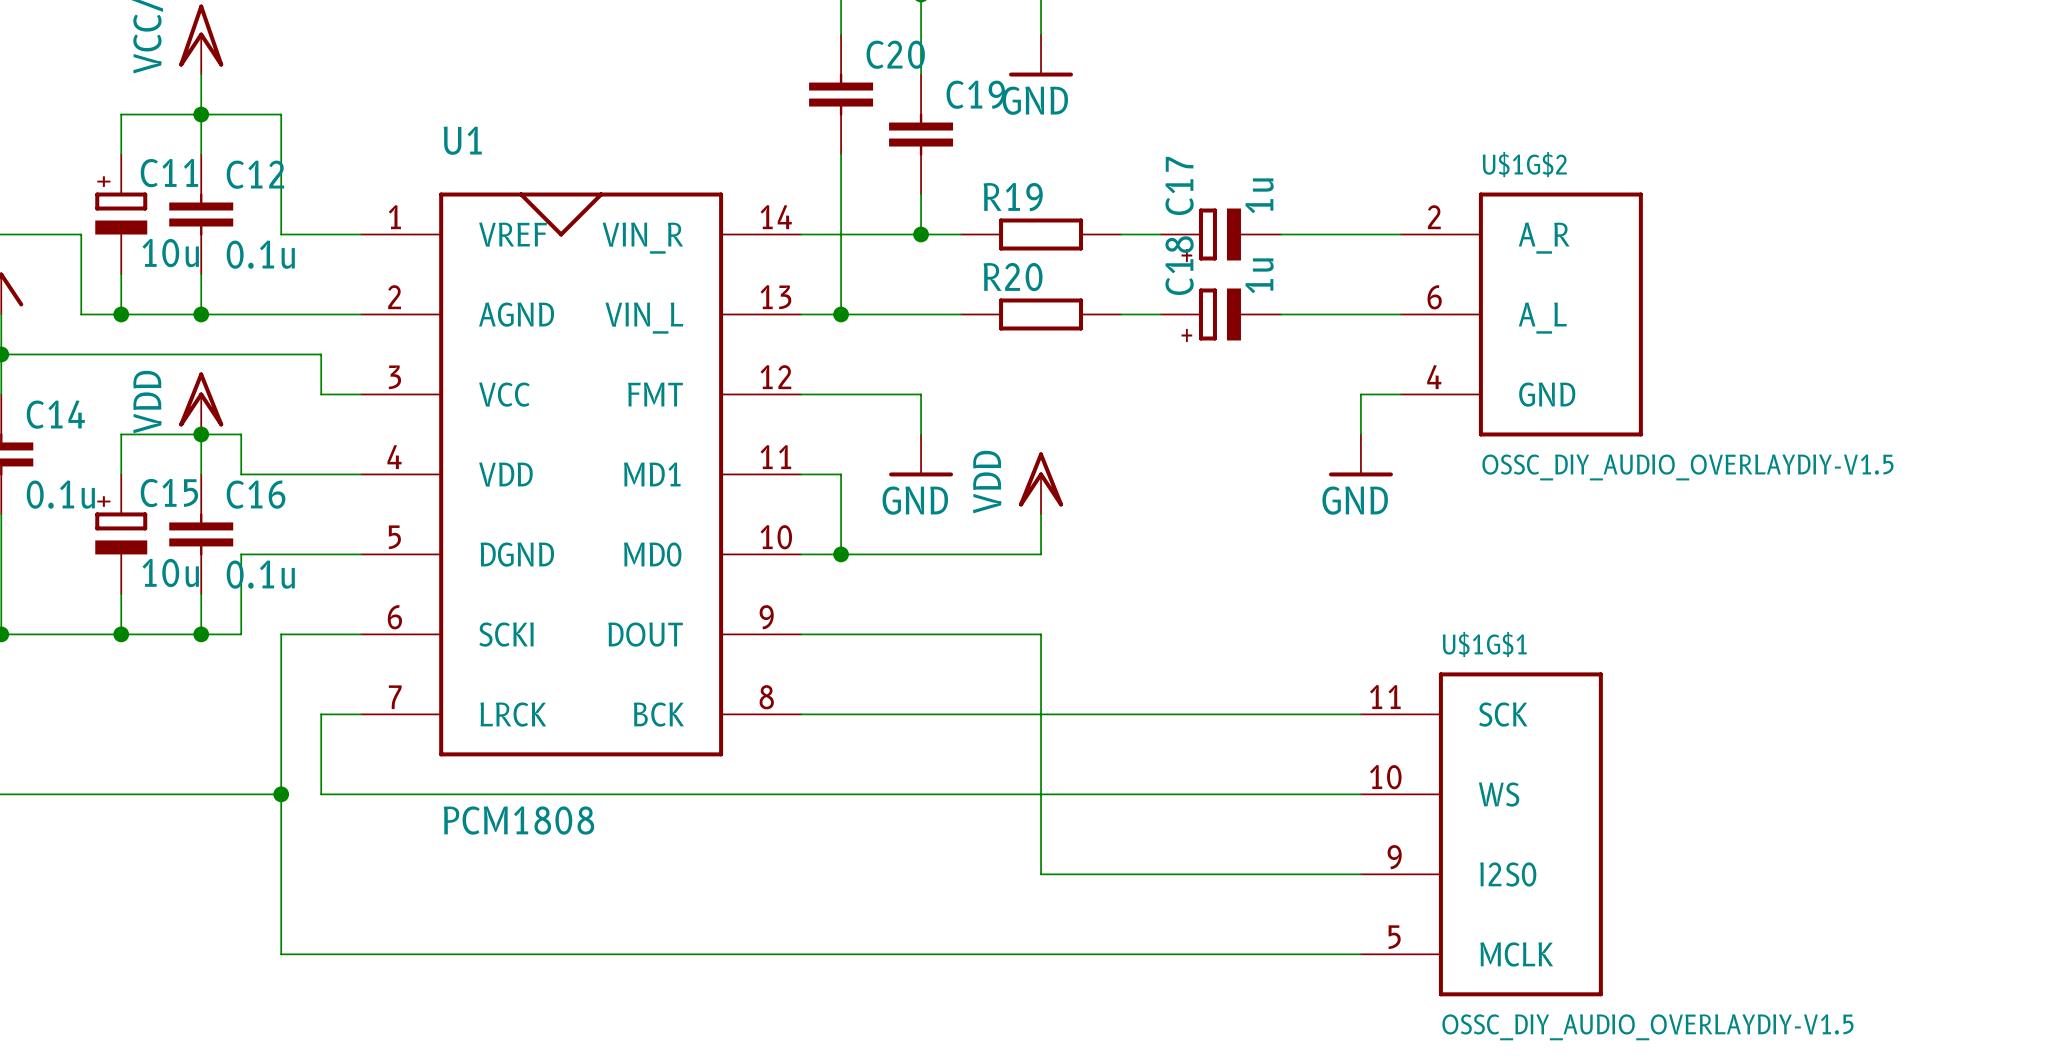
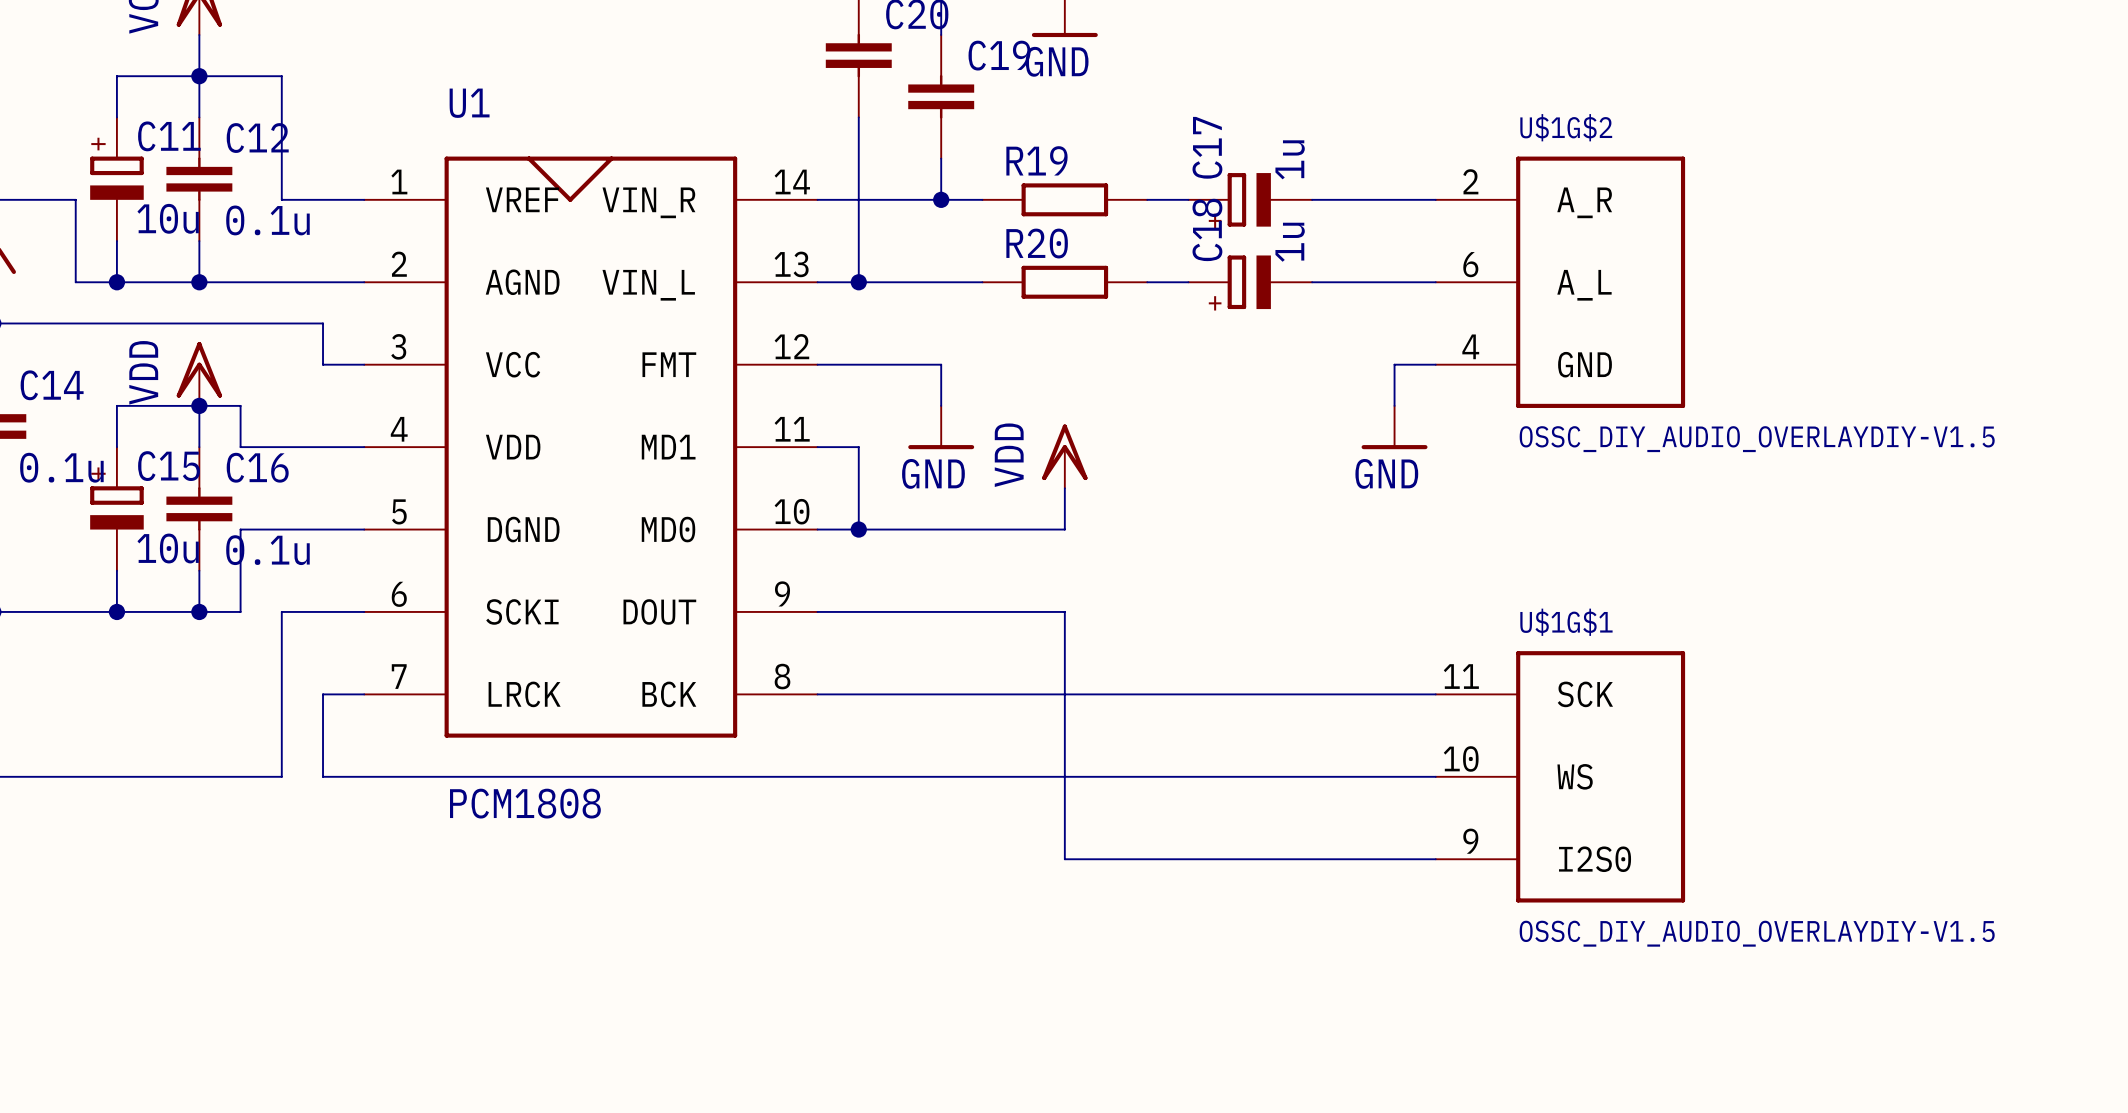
U$1G$1 name position: U$1G$1 (1484, 644) -> U$1G$1 (1566, 622)
U$1G$1 symbol: [1360, 672, 1603, 997] -> [1435, 651, 1686, 903]
wire: (281, 794) (281, 954) (1360, 954) -> none
junction: (281, 794) -> none
U$1G$1 value position: OSSC_DIY_AUDIO_OVERLAYDIY-V1.5 (1647, 1027) -> OSSC_DIY_AUDIO_OVERLAYDIY-V1.5 (1757, 933)

